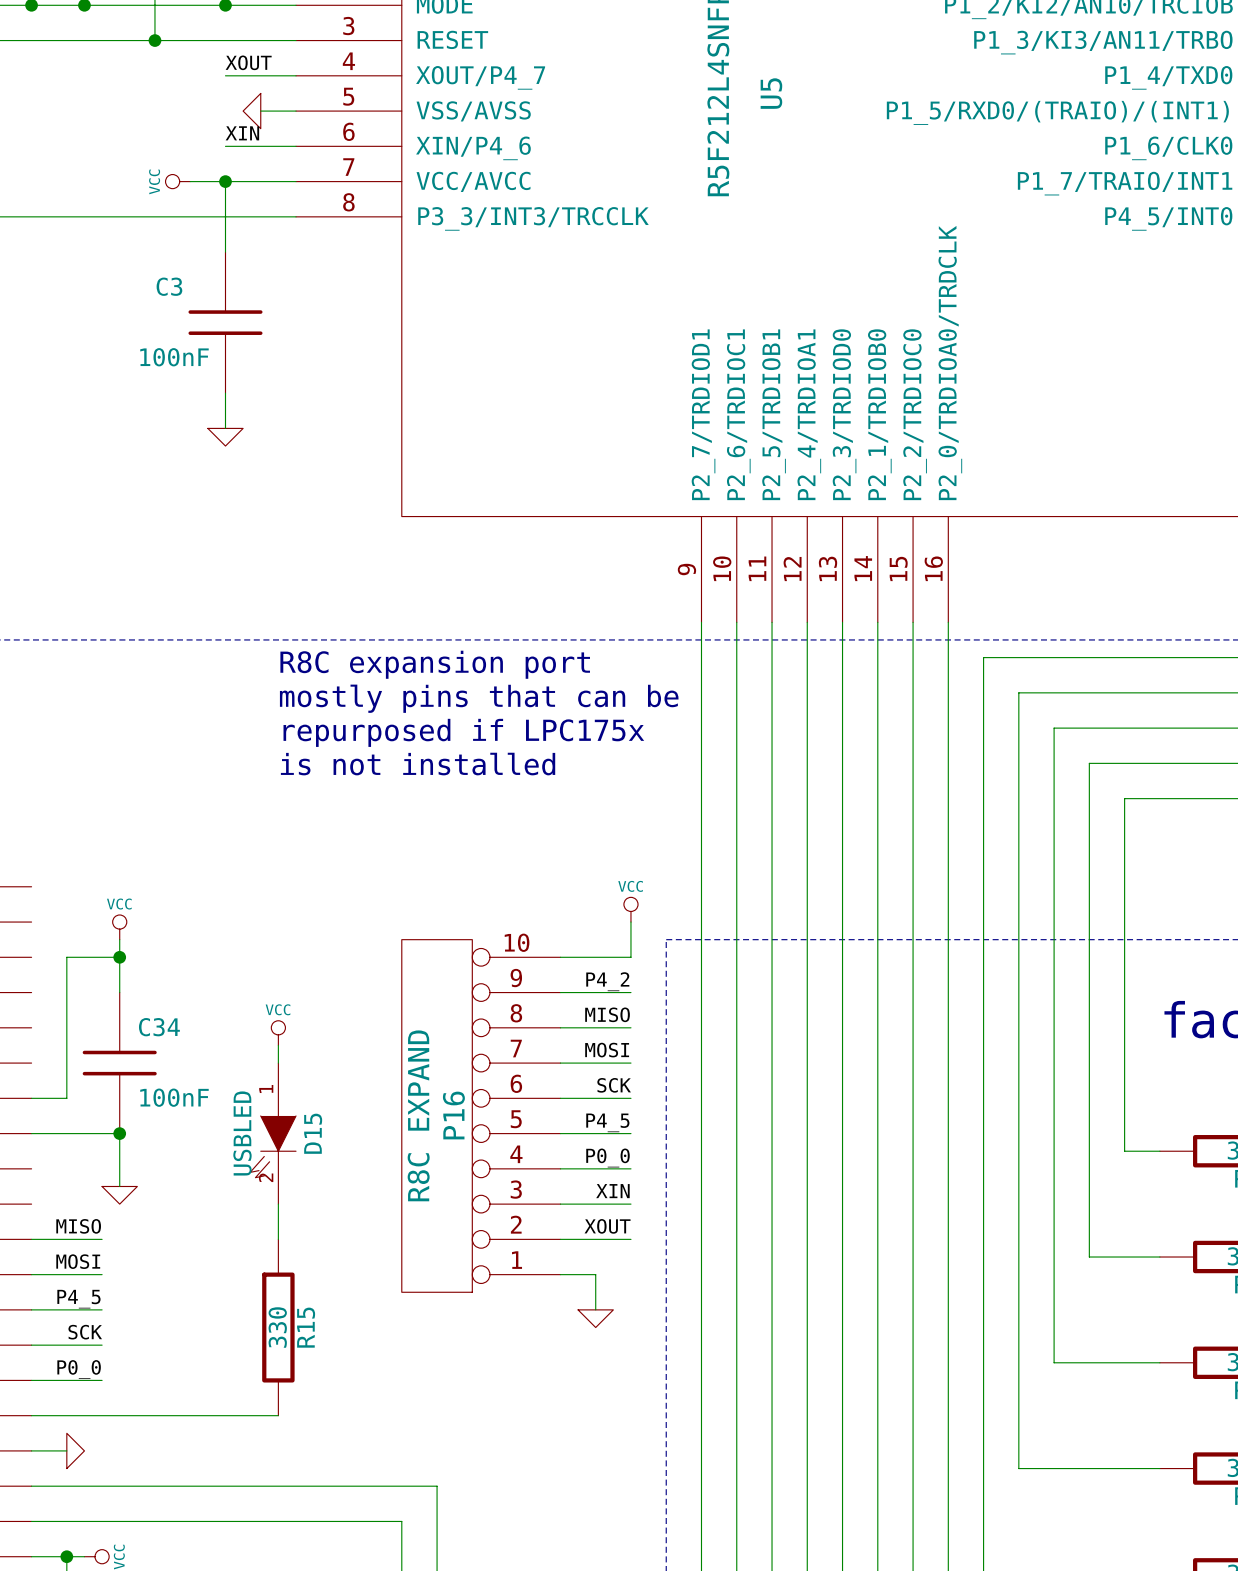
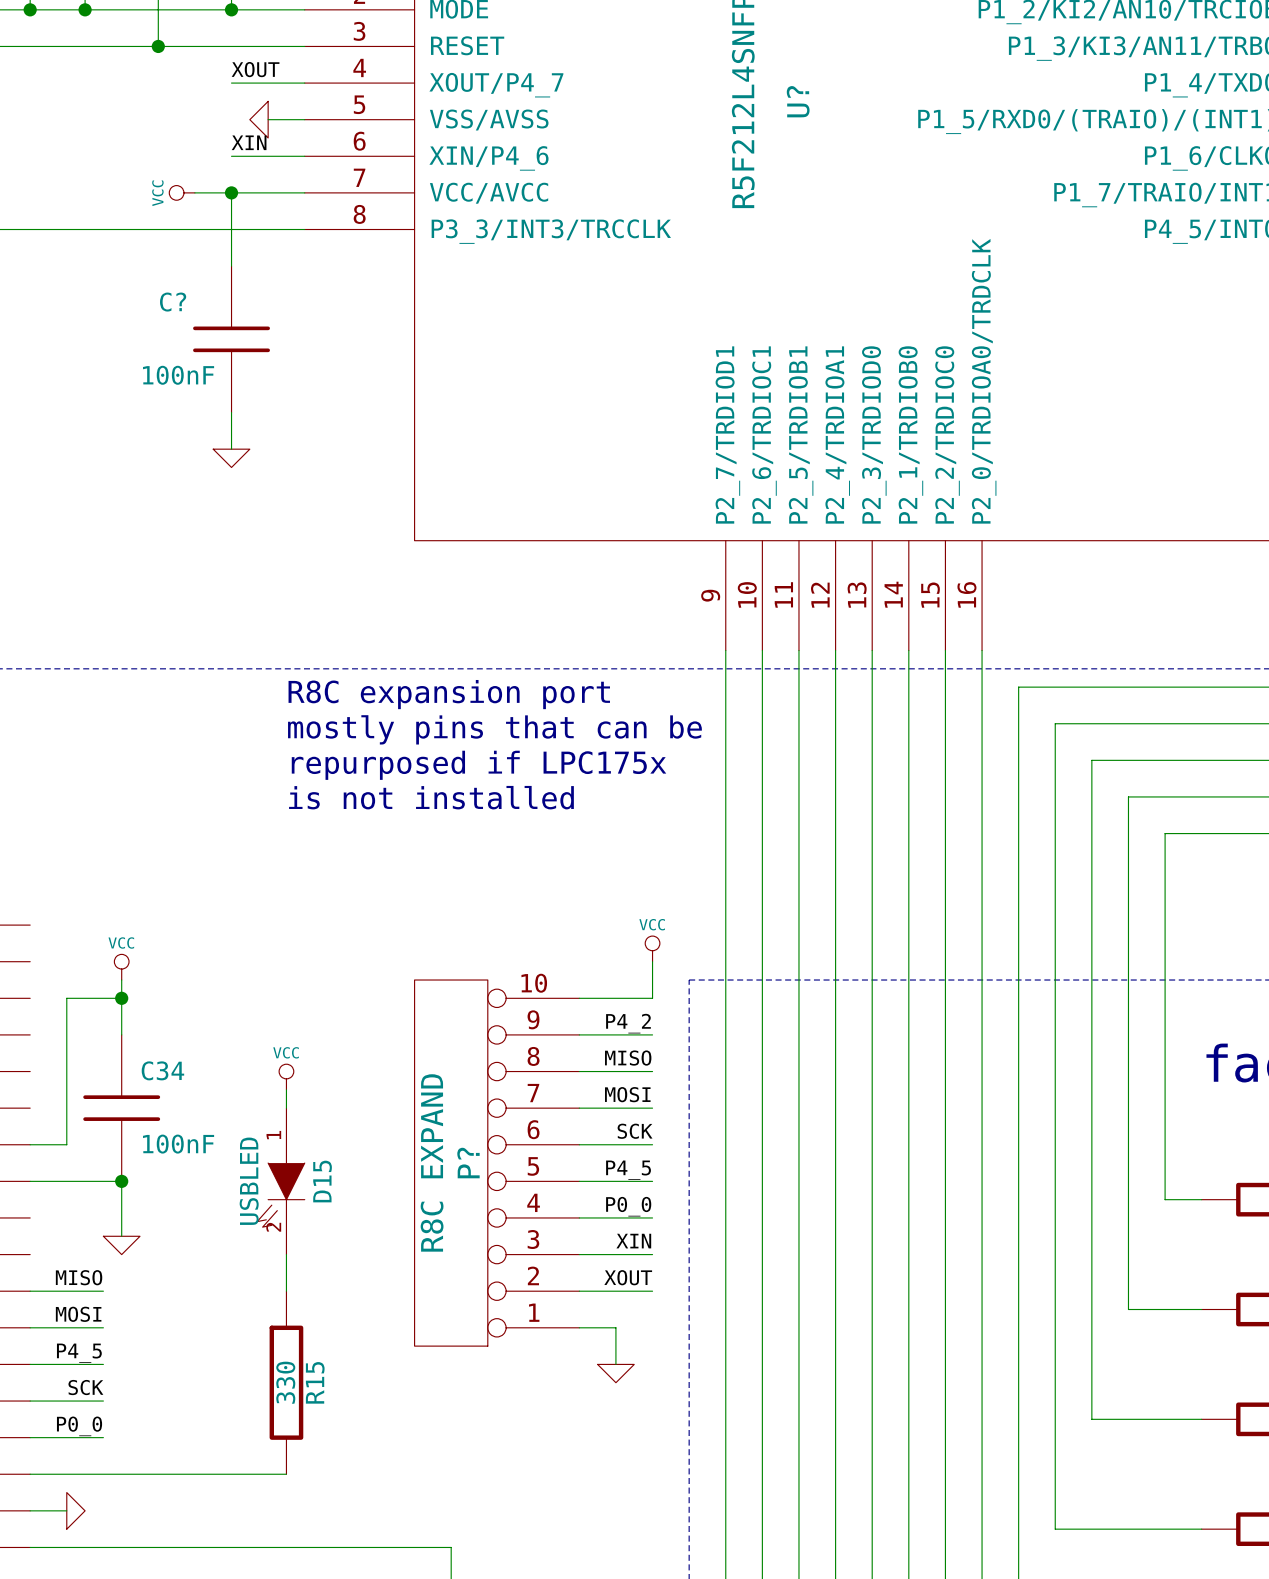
U5 name: U5 (771, 93) -> U? (798, 101)
C3 name: C3 (169, 286) -> C? (173, 302)
P16 name: P16 (453, 1115) -> P? (468, 1163)

